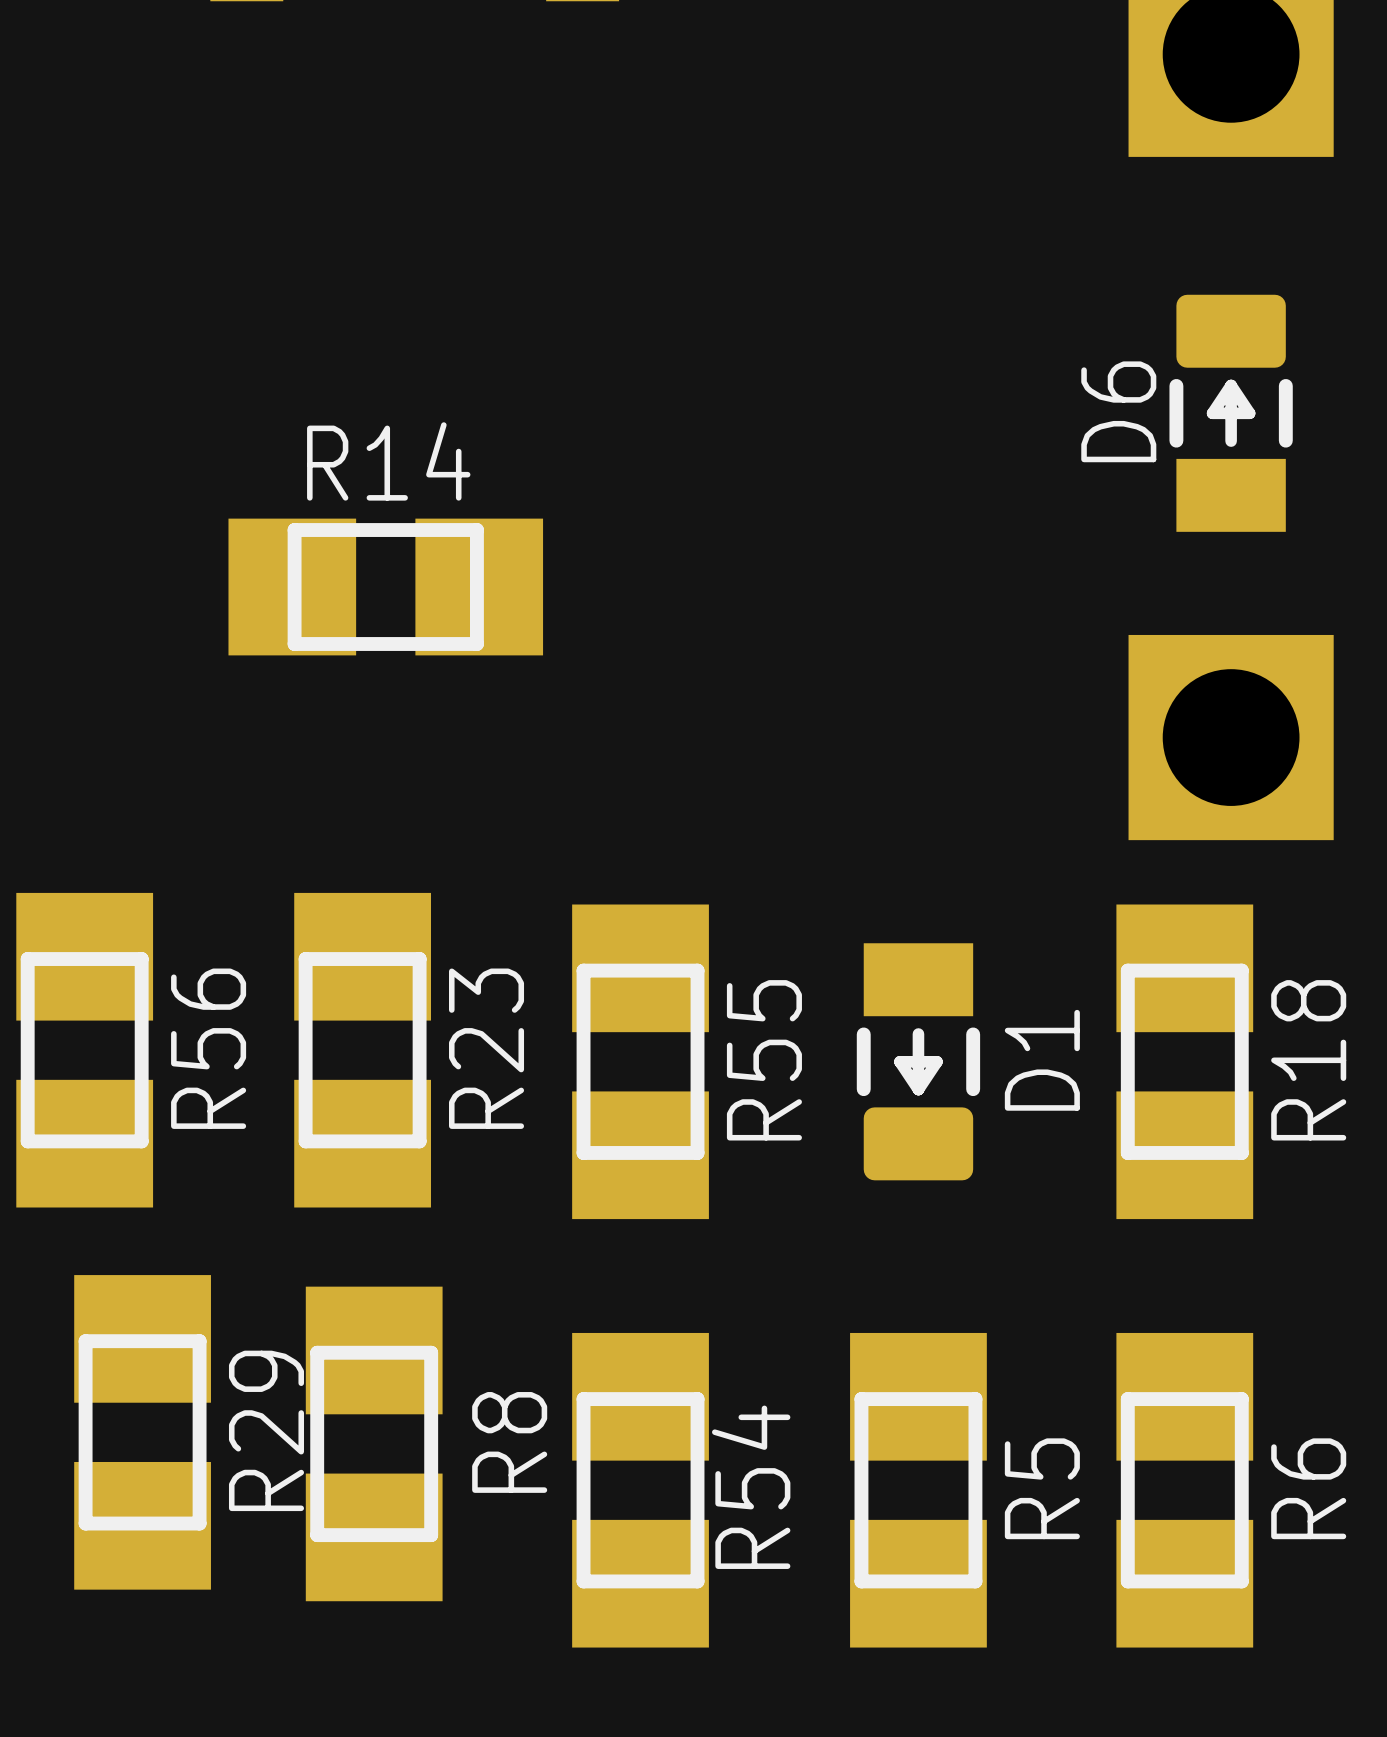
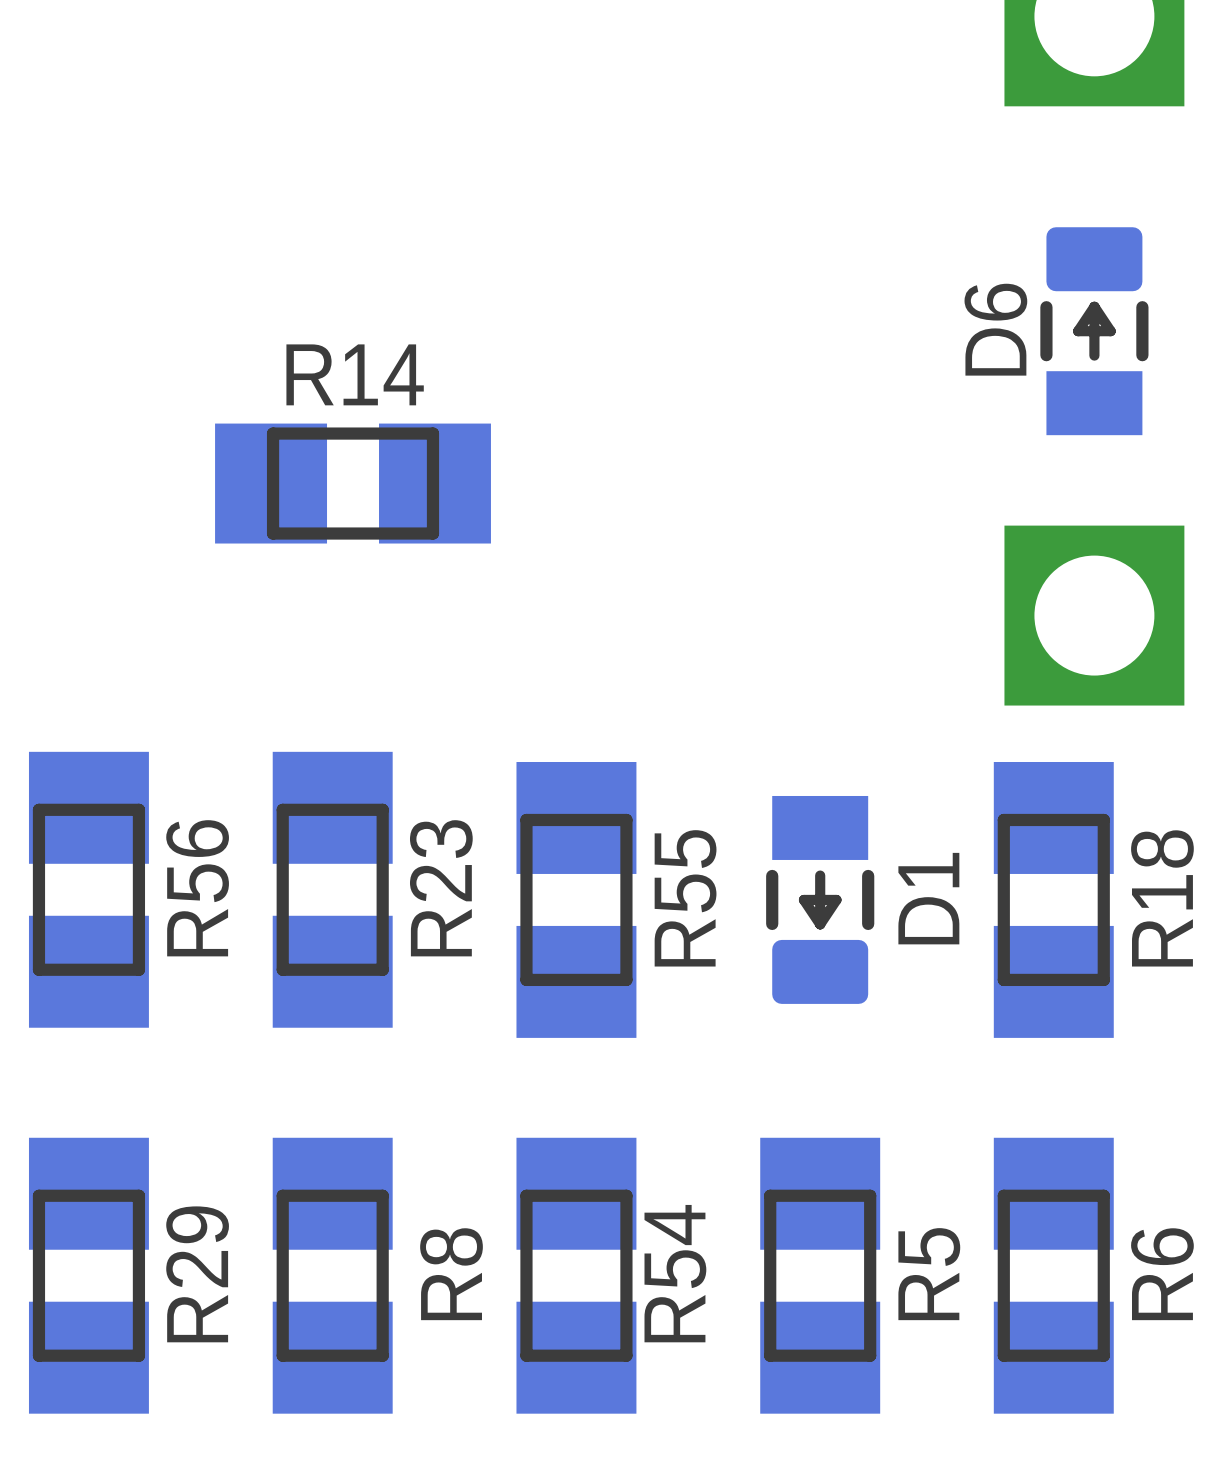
R29 position: (142, 1432) -> (88, 1275)
R8 position: (374, 1443) -> (332, 1275)

